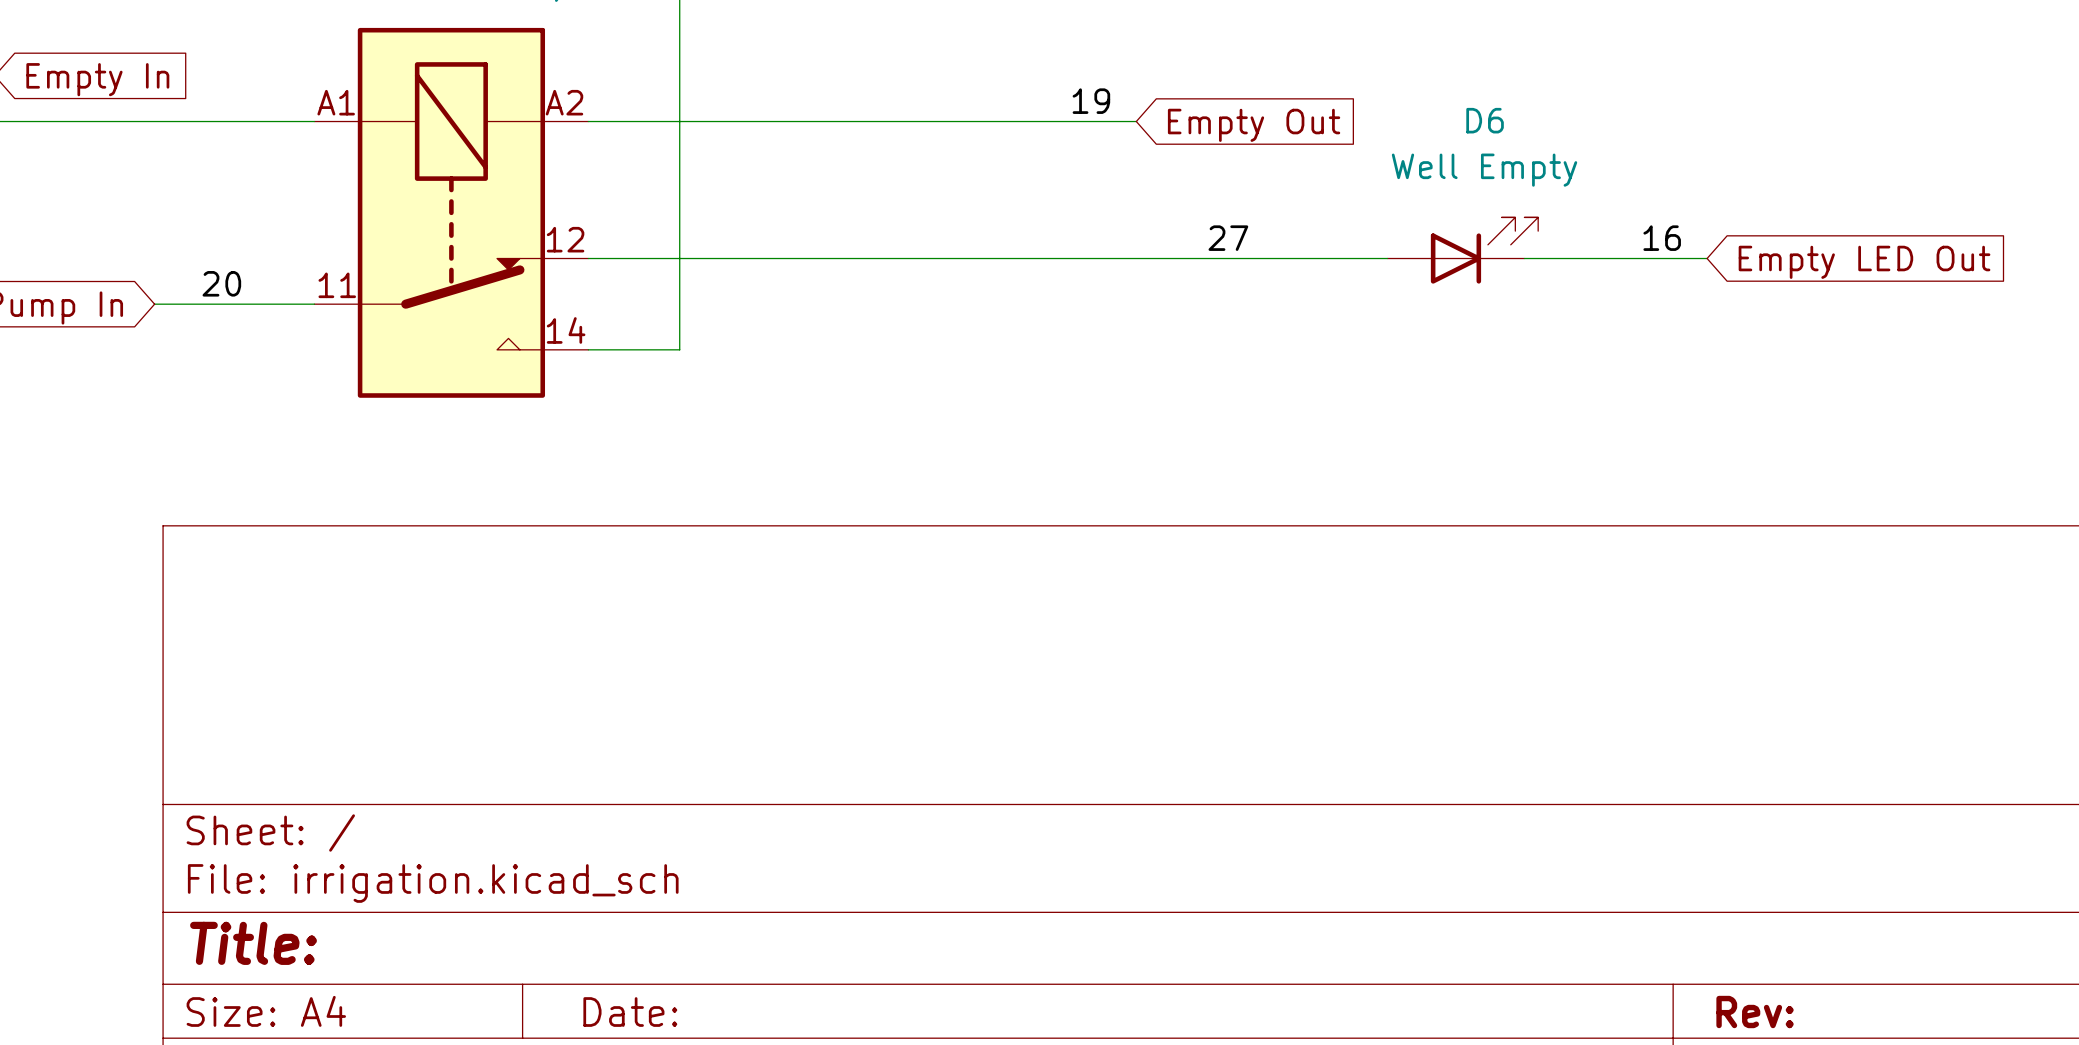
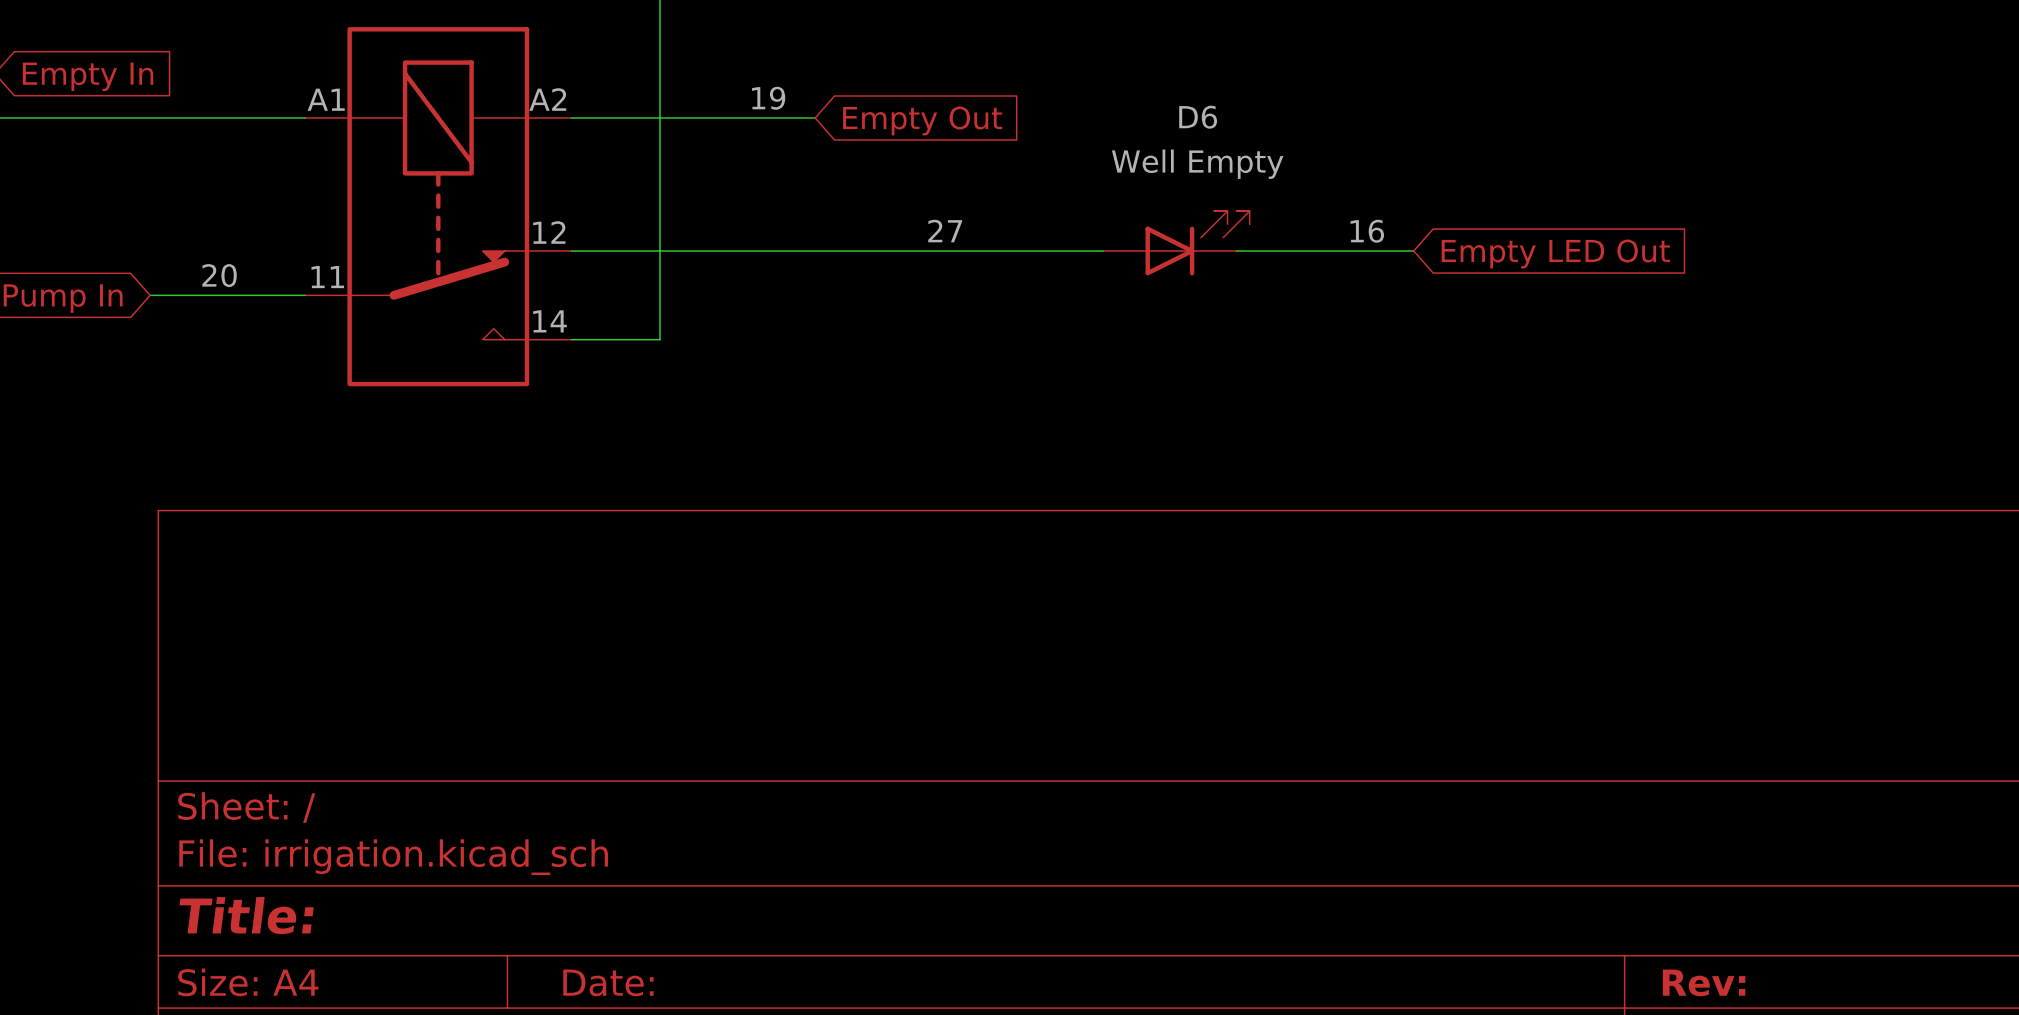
label position: 19 (1091, 101) -> 19 (768, 98)
wire: (839, 121) (1136, 121) -> none
global label position: Empty Out (1254, 125) -> Empty Out (922, 120)
label position: 27 (1228, 238) -> 27 (945, 231)
label position: 16 (1662, 238) -> 16 (1367, 231)
D6 position: (1462, 250) -> (1176, 243)
wire: (1524, 258) (1707, 258) -> none
global label position: Empty LED Out (1864, 262) -> Empty LED Out (1555, 253)

